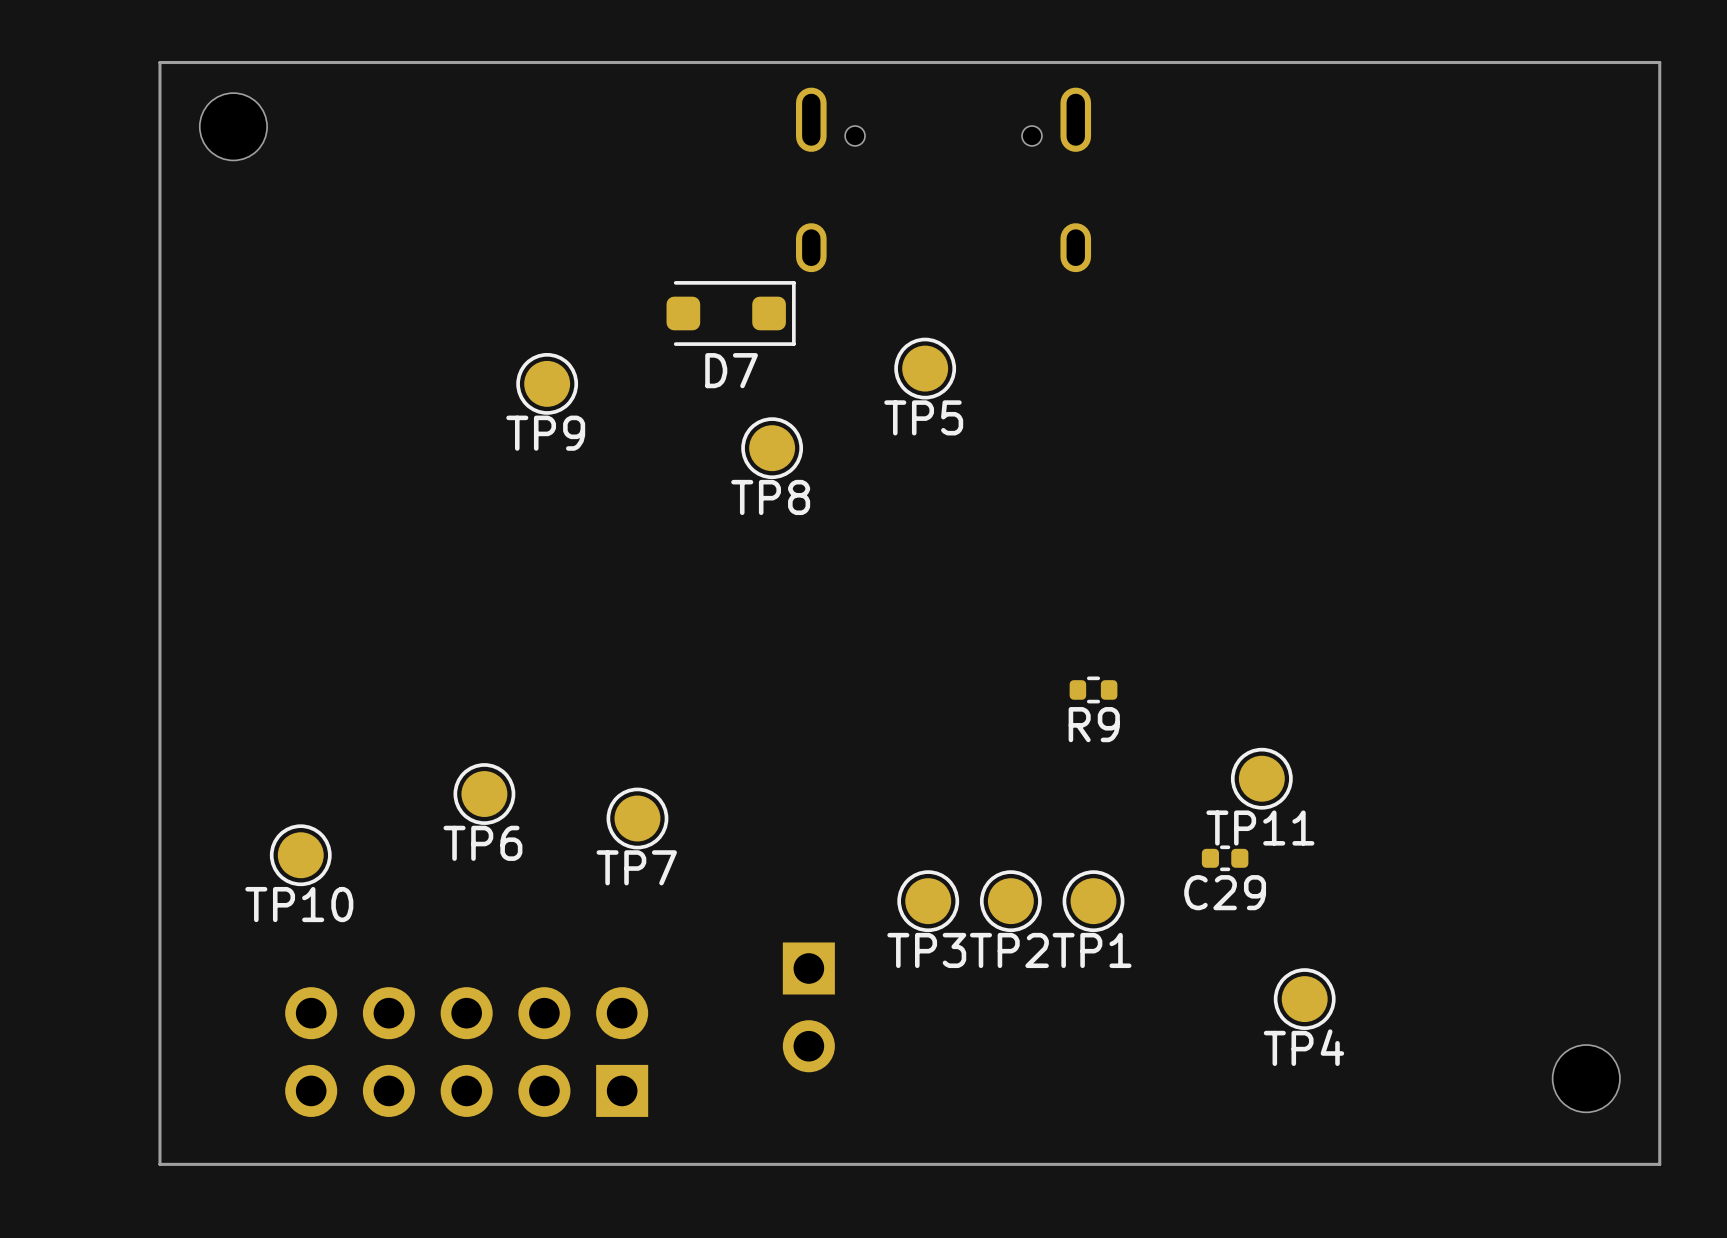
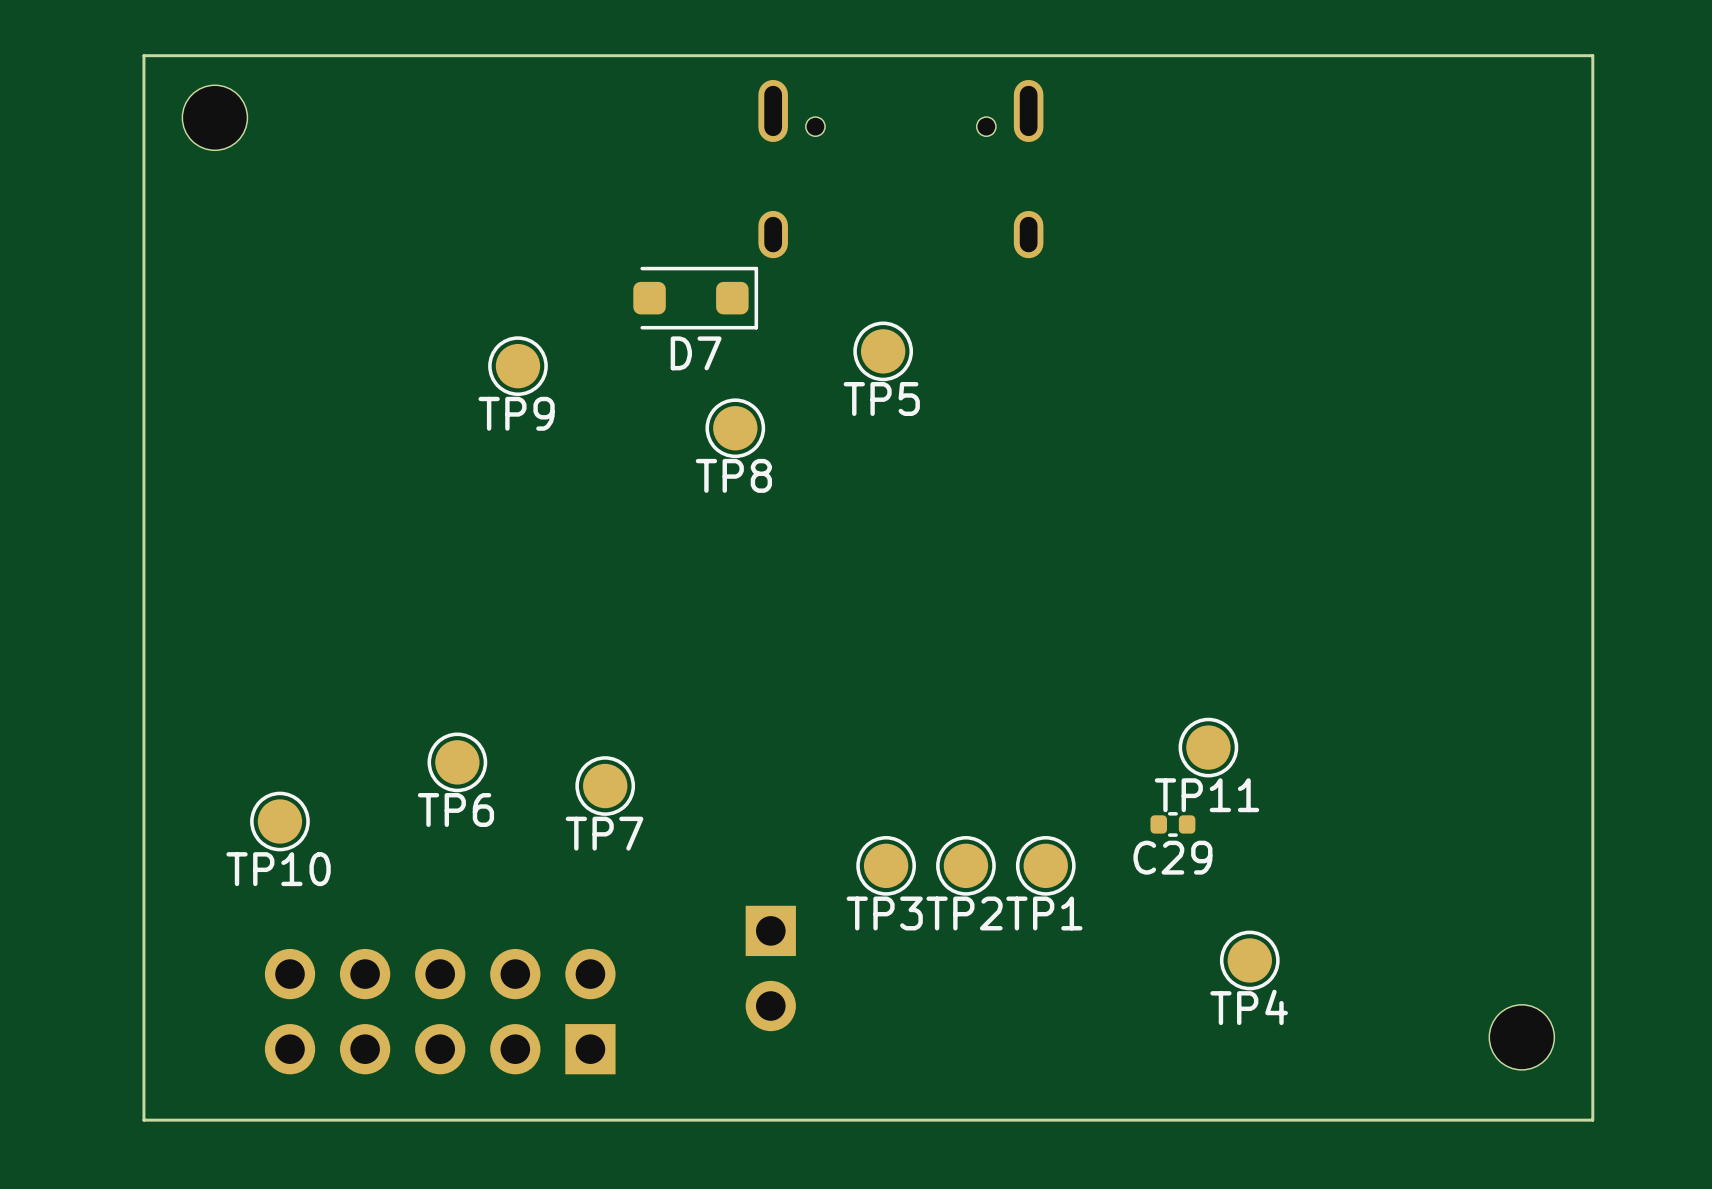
R9: (1093, 689) -> none

